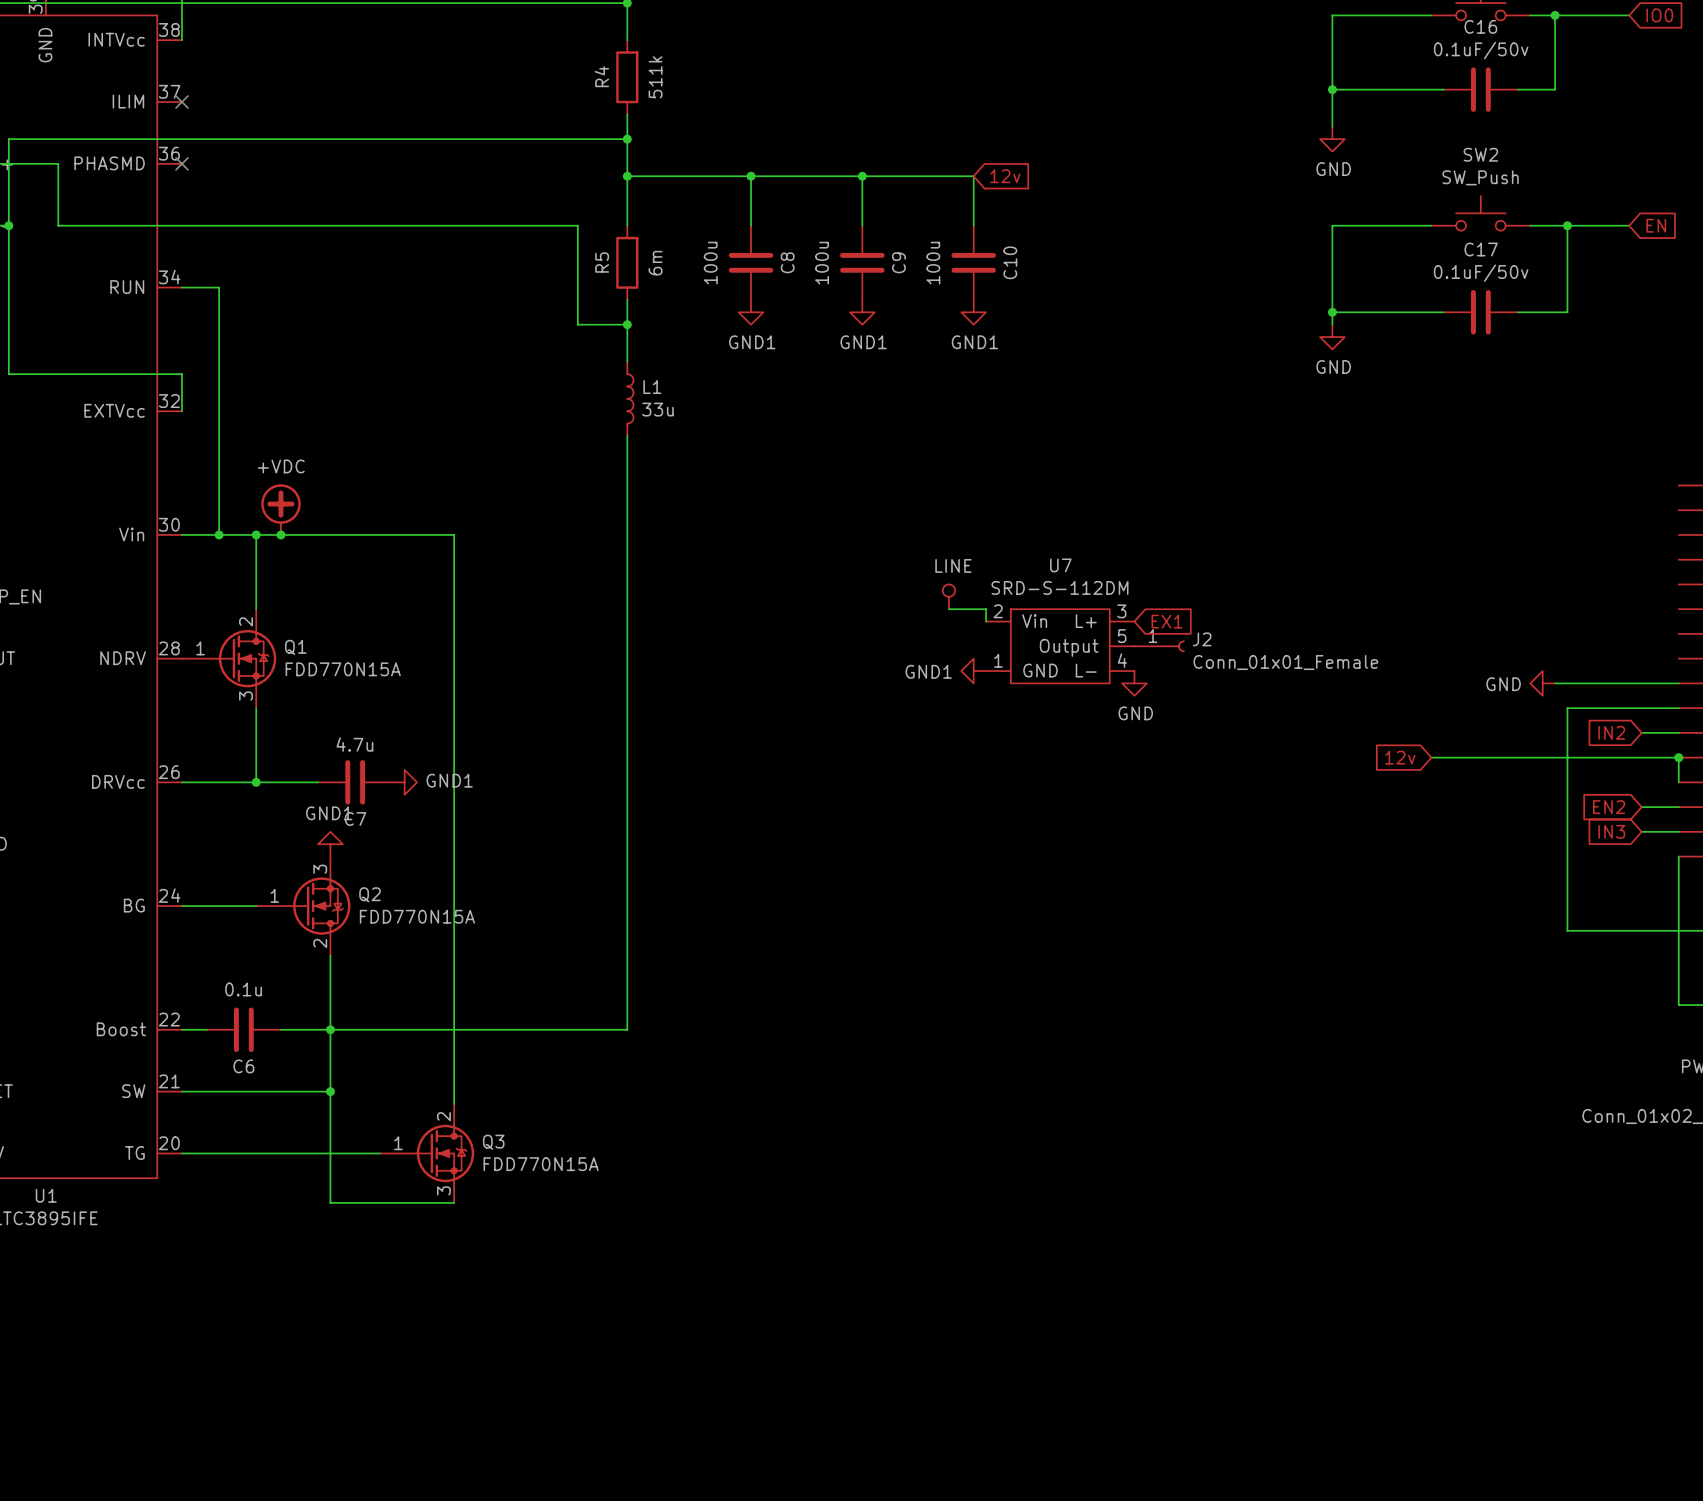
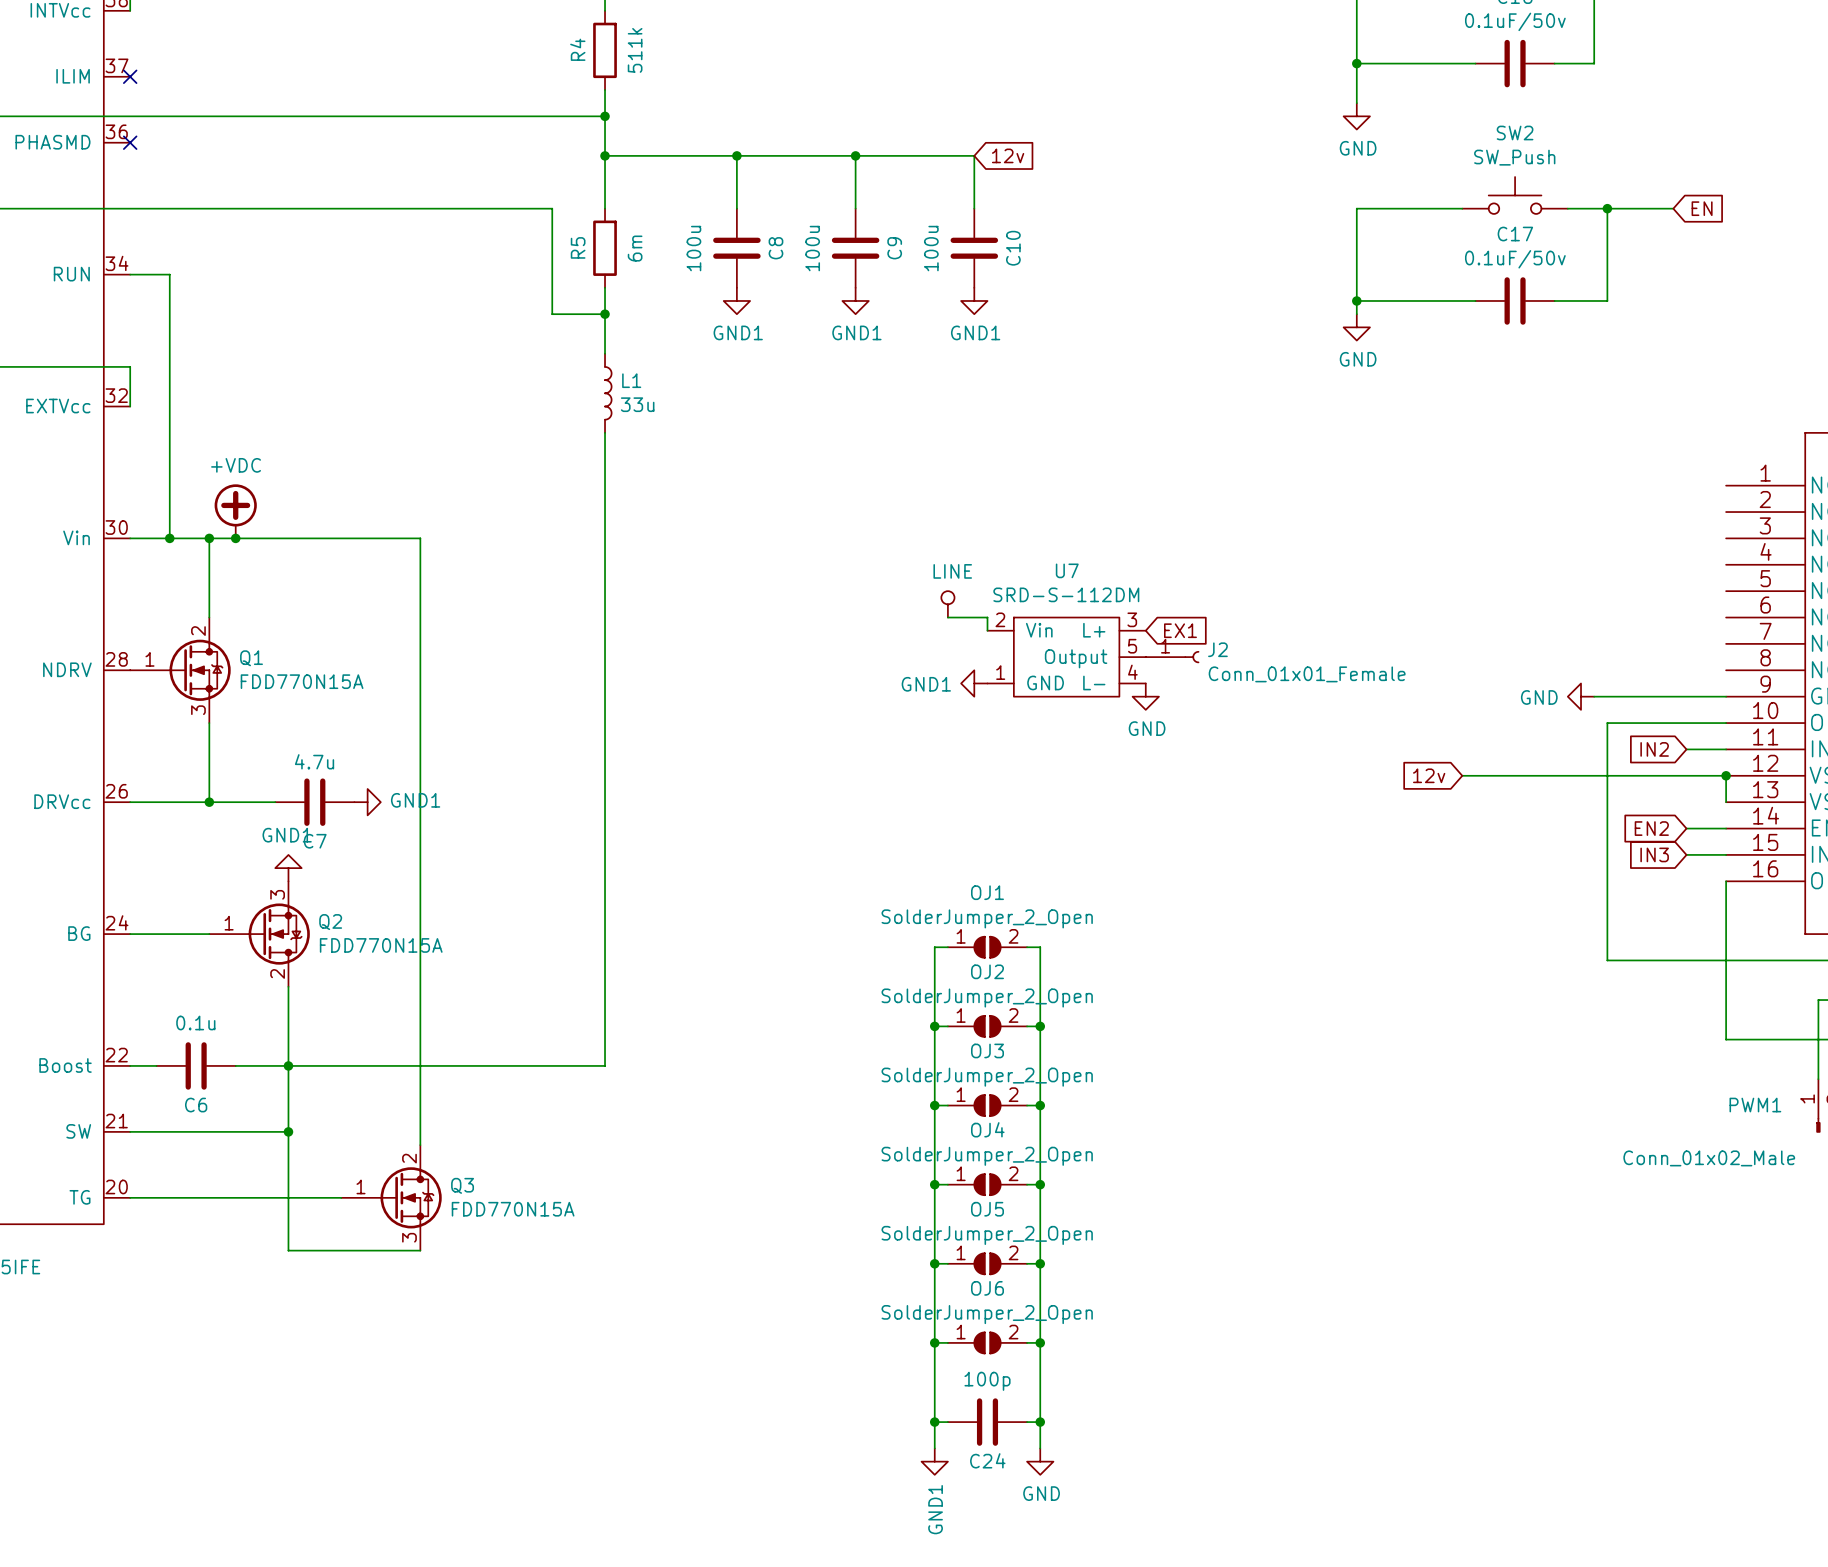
wire: none -> (947, 947) (934, 947) (934, 1448)
OJ1: none -> SolderJumper_2_Open (987, 947)
wire: none -> (1027, 947) (1040, 947) (1040, 1448)
wire: none -> (934, 1026) (947, 1026)
junction: none -> (934, 1026)
OJ2: none -> SolderJumper_2_Open (987, 1026)
wire: none -> (1027, 1026) (1040, 1026)
junction: none -> (1040, 1026)
wire: none -> (934, 1105) (947, 1105)
junction: none -> (934, 1105)
OJ3: none -> SolderJumper_2_Open (987, 1105)
wire: none -> (1027, 1105) (1040, 1105)
junction: none -> (1040, 1105)
wire: none -> (934, 1184) (947, 1184)
junction: none -> (934, 1184)
OJ4: none -> SolderJumper_2_Open (987, 1184)
wire: none -> (1027, 1184) (1040, 1184)
junction: none -> (1040, 1184)
wire: none -> (934, 1263) (947, 1263)
junction: none -> (934, 1263)
OJ5: none -> SolderJumper_2_Open (987, 1263)
wire: none -> (1027, 1263) (1040, 1263)
junction: none -> (1040, 1263)
wire: none -> (934, 1342) (947, 1342)
junction: none -> (934, 1342)
OJ6: none -> SolderJumper_2_Open (987, 1342)
wire: none -> (1027, 1342) (1040, 1342)
junction: none -> (1040, 1342)
wire: none -> (934, 1422) (947, 1422)
junction: none -> (934, 1422)
C24: none -> 100p (987, 1422)
wire: none -> (1027, 1422) (1040, 1422)
junction: none -> (1040, 1422)
power symbol: none -> GND1 (934, 1461)
power symbol: none -> GND (1040, 1461)

